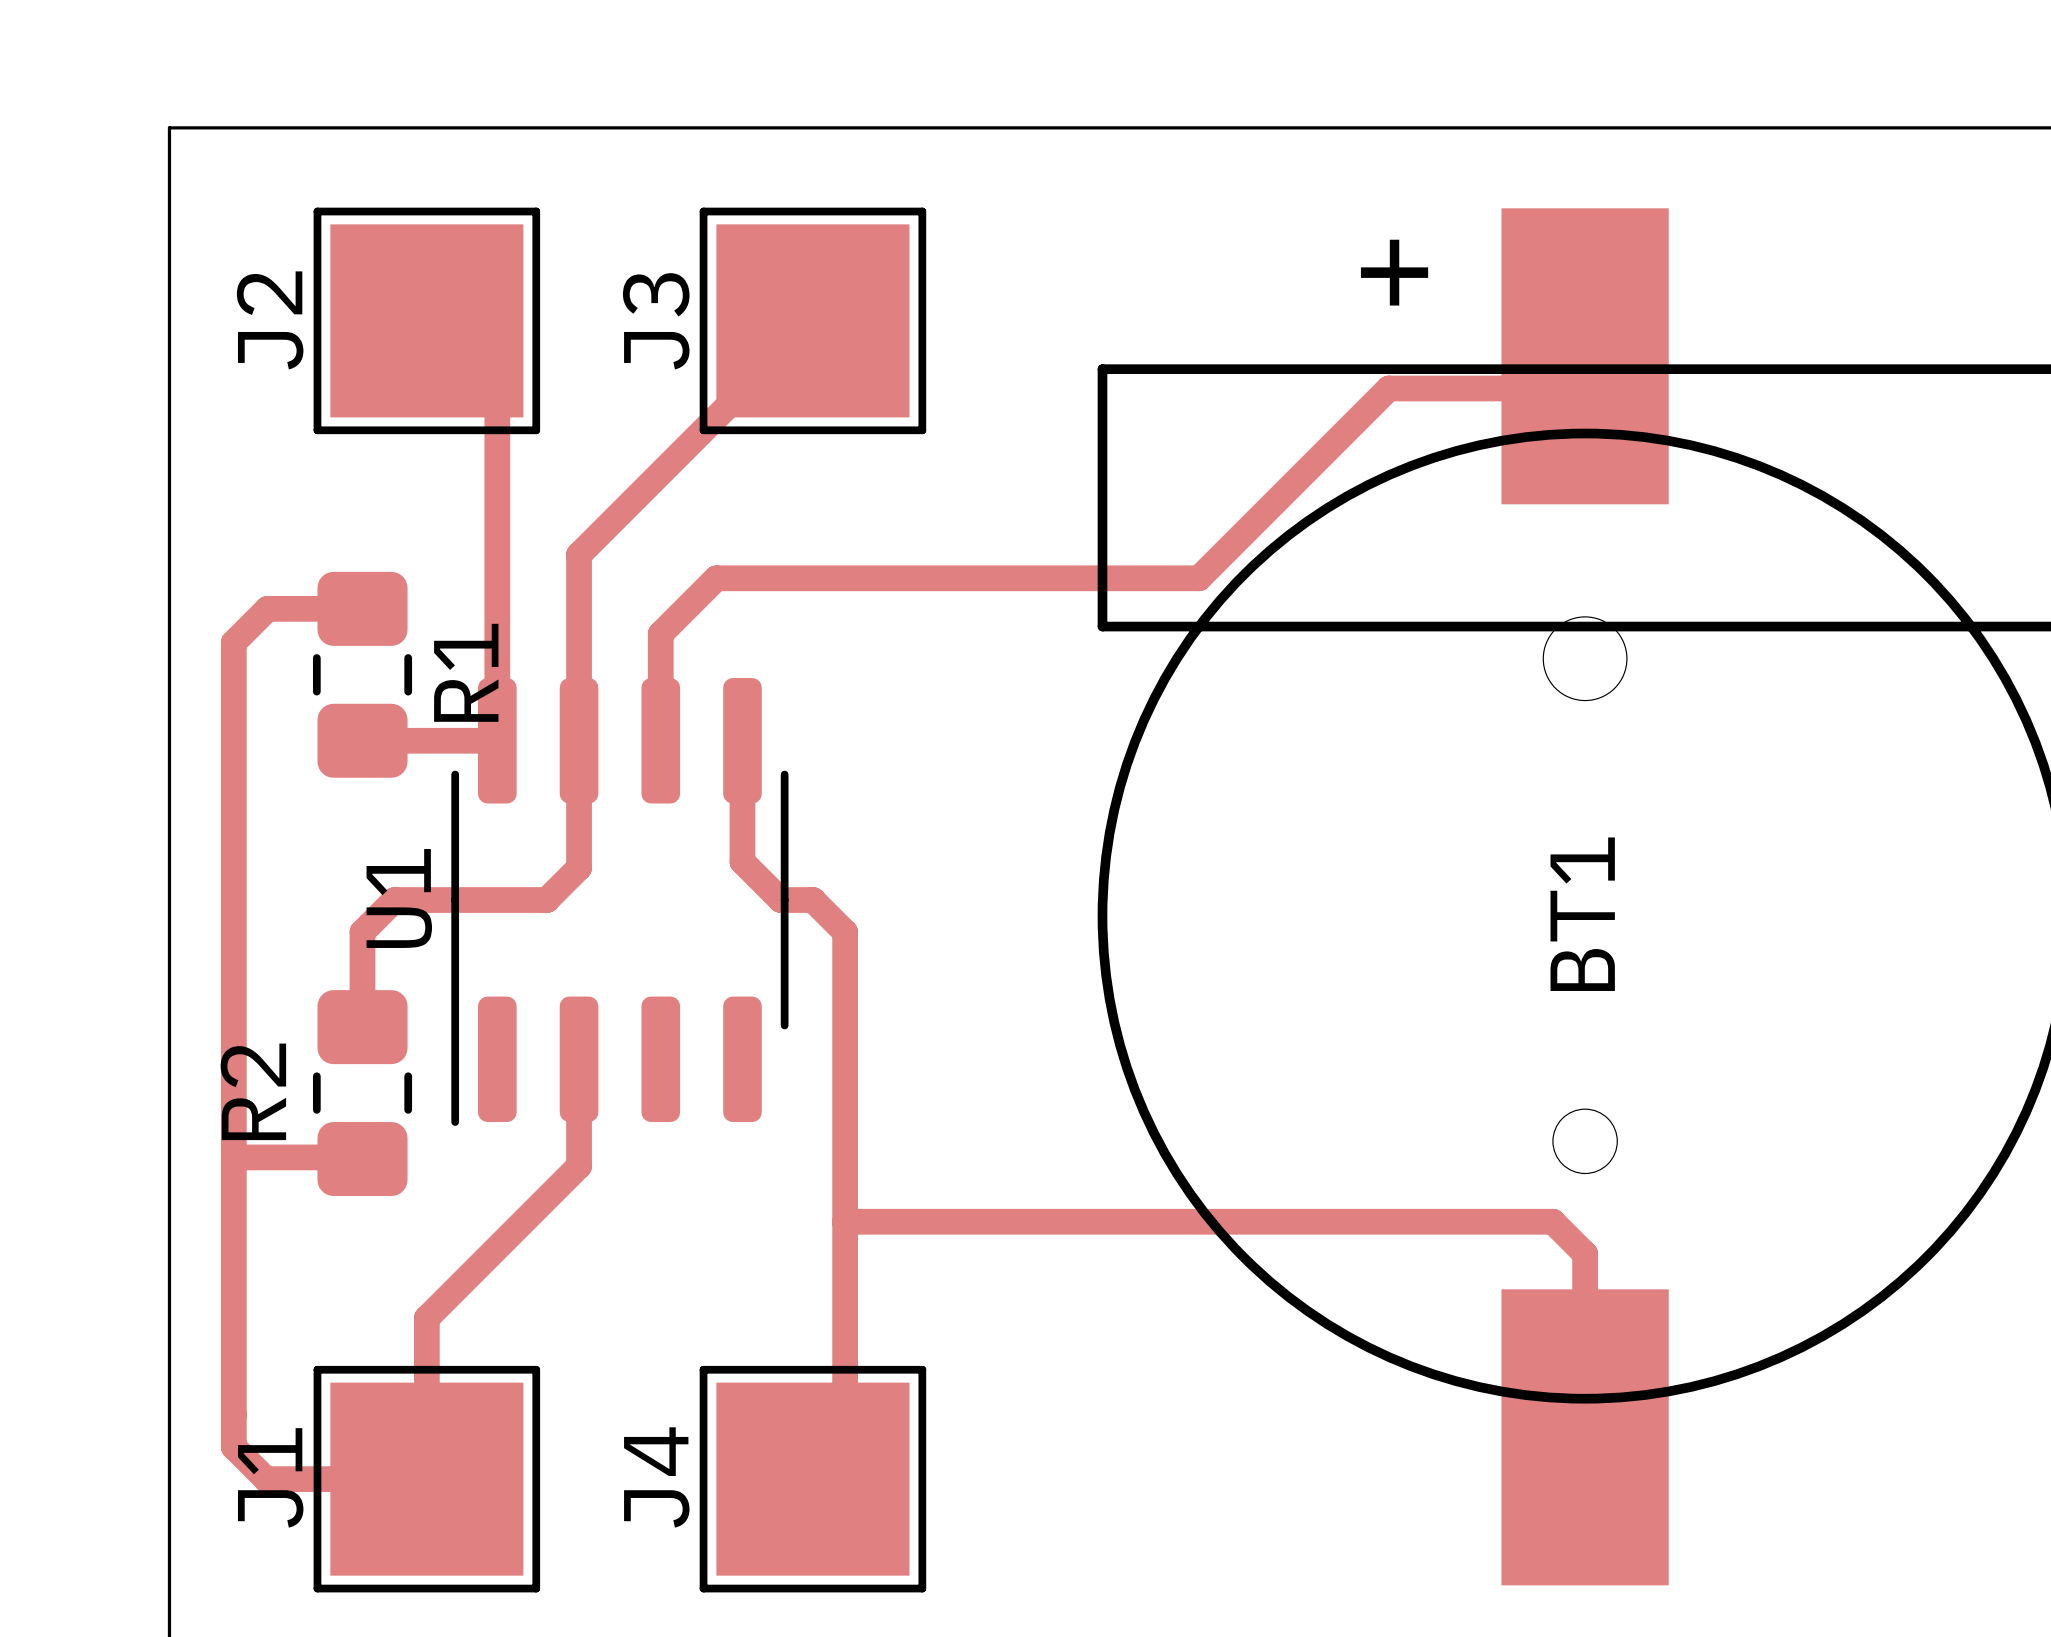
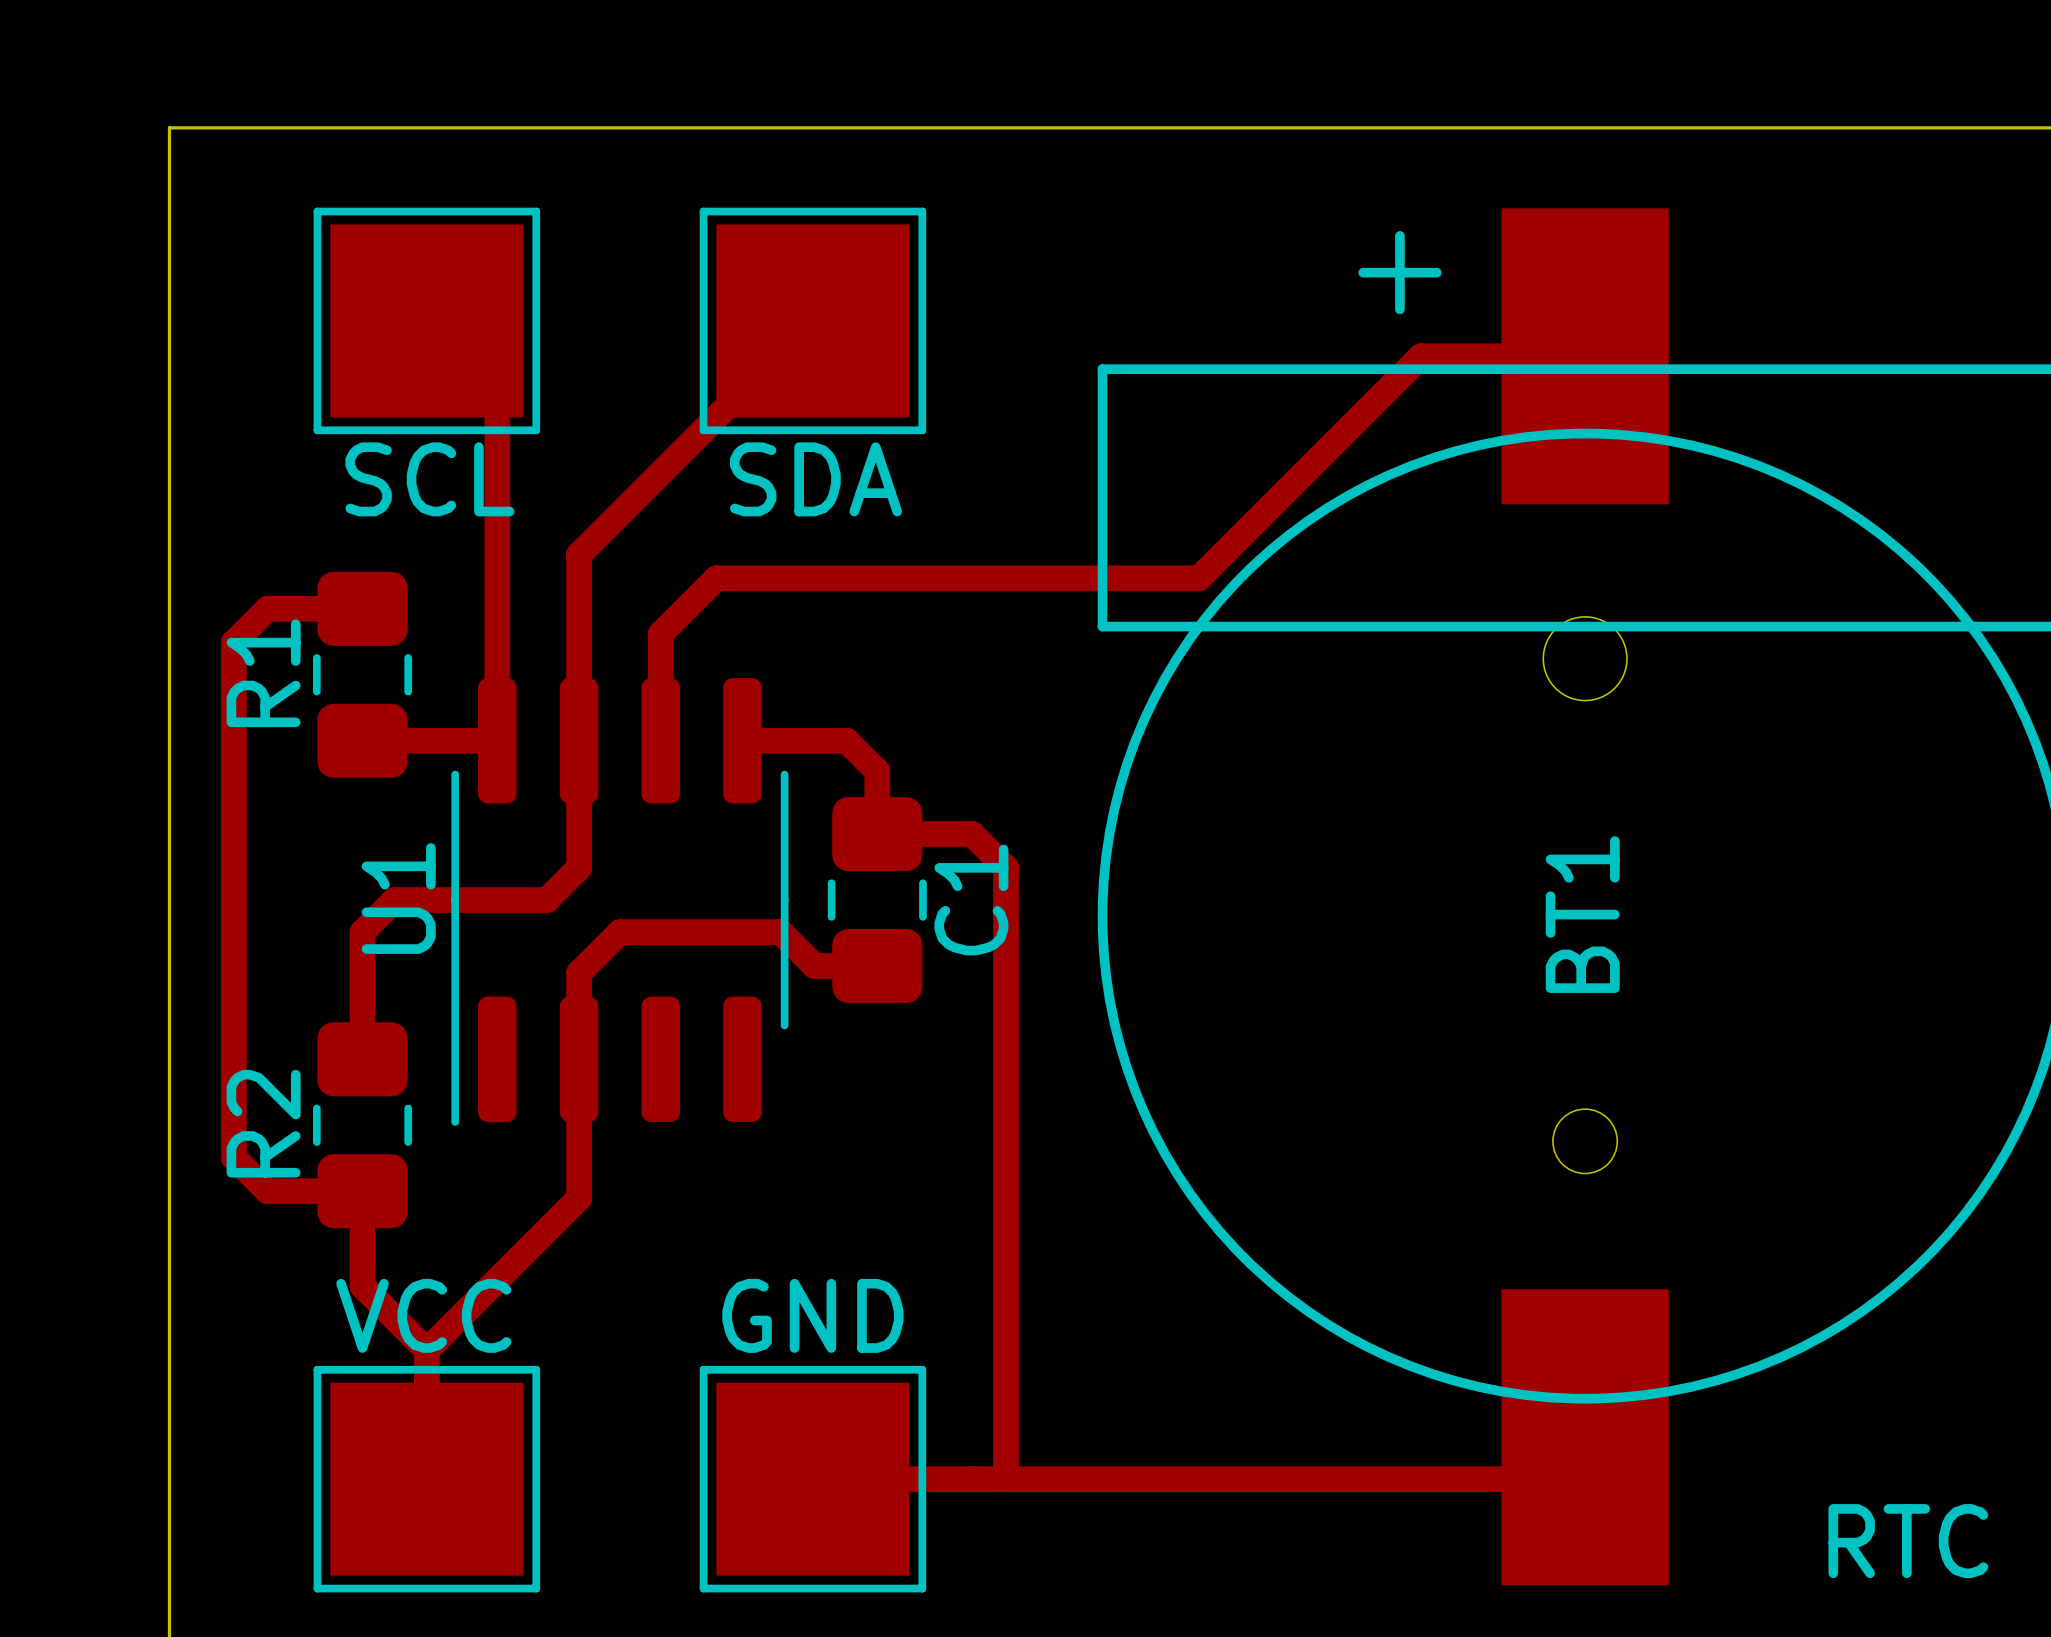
J2 name: J2 (270, 320) -> none
J3 name: J3 (656, 321) -> none
track: (1388, 388) (1585, 388) -> (1388, 388) (1421, 356) (1585, 356)
text: none -> SCL (429, 479)
text: none -> SDA (816, 479)
R1 name position: R1 (466, 672) -> R1 (263, 673)
track: (742, 740) (742, 861) (780, 900) (812, 900) (845, 932) (845, 1446) (812, 1479) -> (742, 740) (846, 740) (877, 771) (877, 834) (972, 834) (1005, 867) (1005, 1479)
C1: none -> (877, 900)
track: none -> (877, 965) (814, 965) (780, 932) (619, 932) (579, 973) (579, 1059)
R2 name position: R2 (253, 1091) -> R2 (263, 1123)
R2 position: (362, 1093) -> (362, 1125)
track: (328, 1157) (233, 1157) (233, 1446) (265, 1479) (426, 1479) -> none
track: (579, 1166) (426, 1318) (426, 1350) -> (579, 1166) (579, 1198) (426, 1350) (362, 1286) (362, 1191) (267, 1191) (233, 1157)
track: (845, 1221) (1552, 1221) (1585, 1253) (1585, 1405) -> none
text: none -> VCC (423, 1315)
text: none -> GND (812, 1315)
track: none -> (1585, 1437) (1543, 1479) (812, 1479)
J1 name: J1 (270, 1477) -> none
J4 name: J4 (656, 1477) -> none
text: none -> RTC (1908, 1541)

